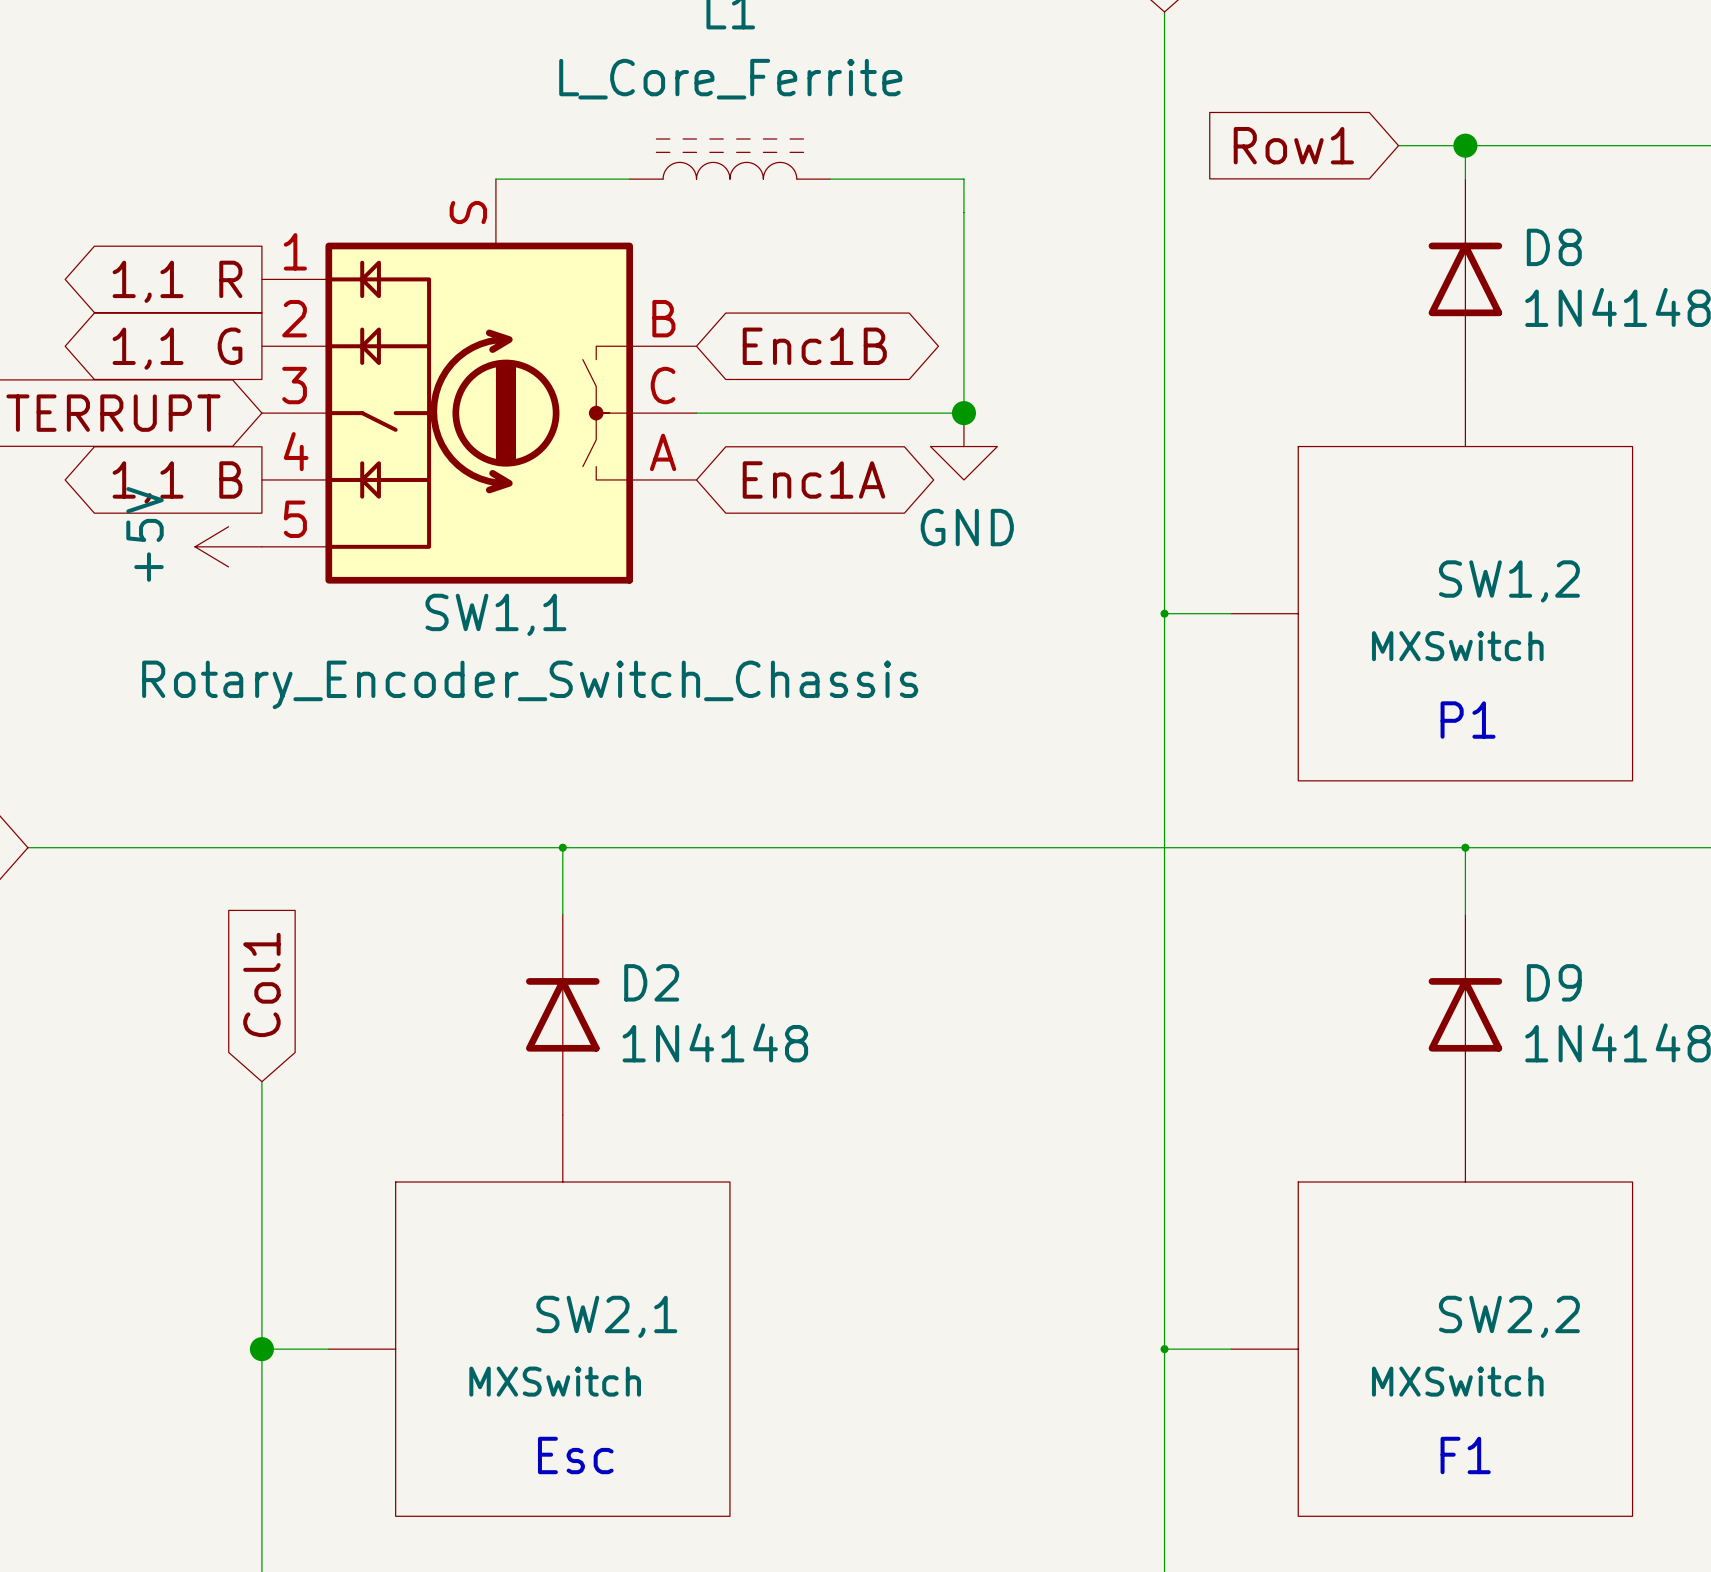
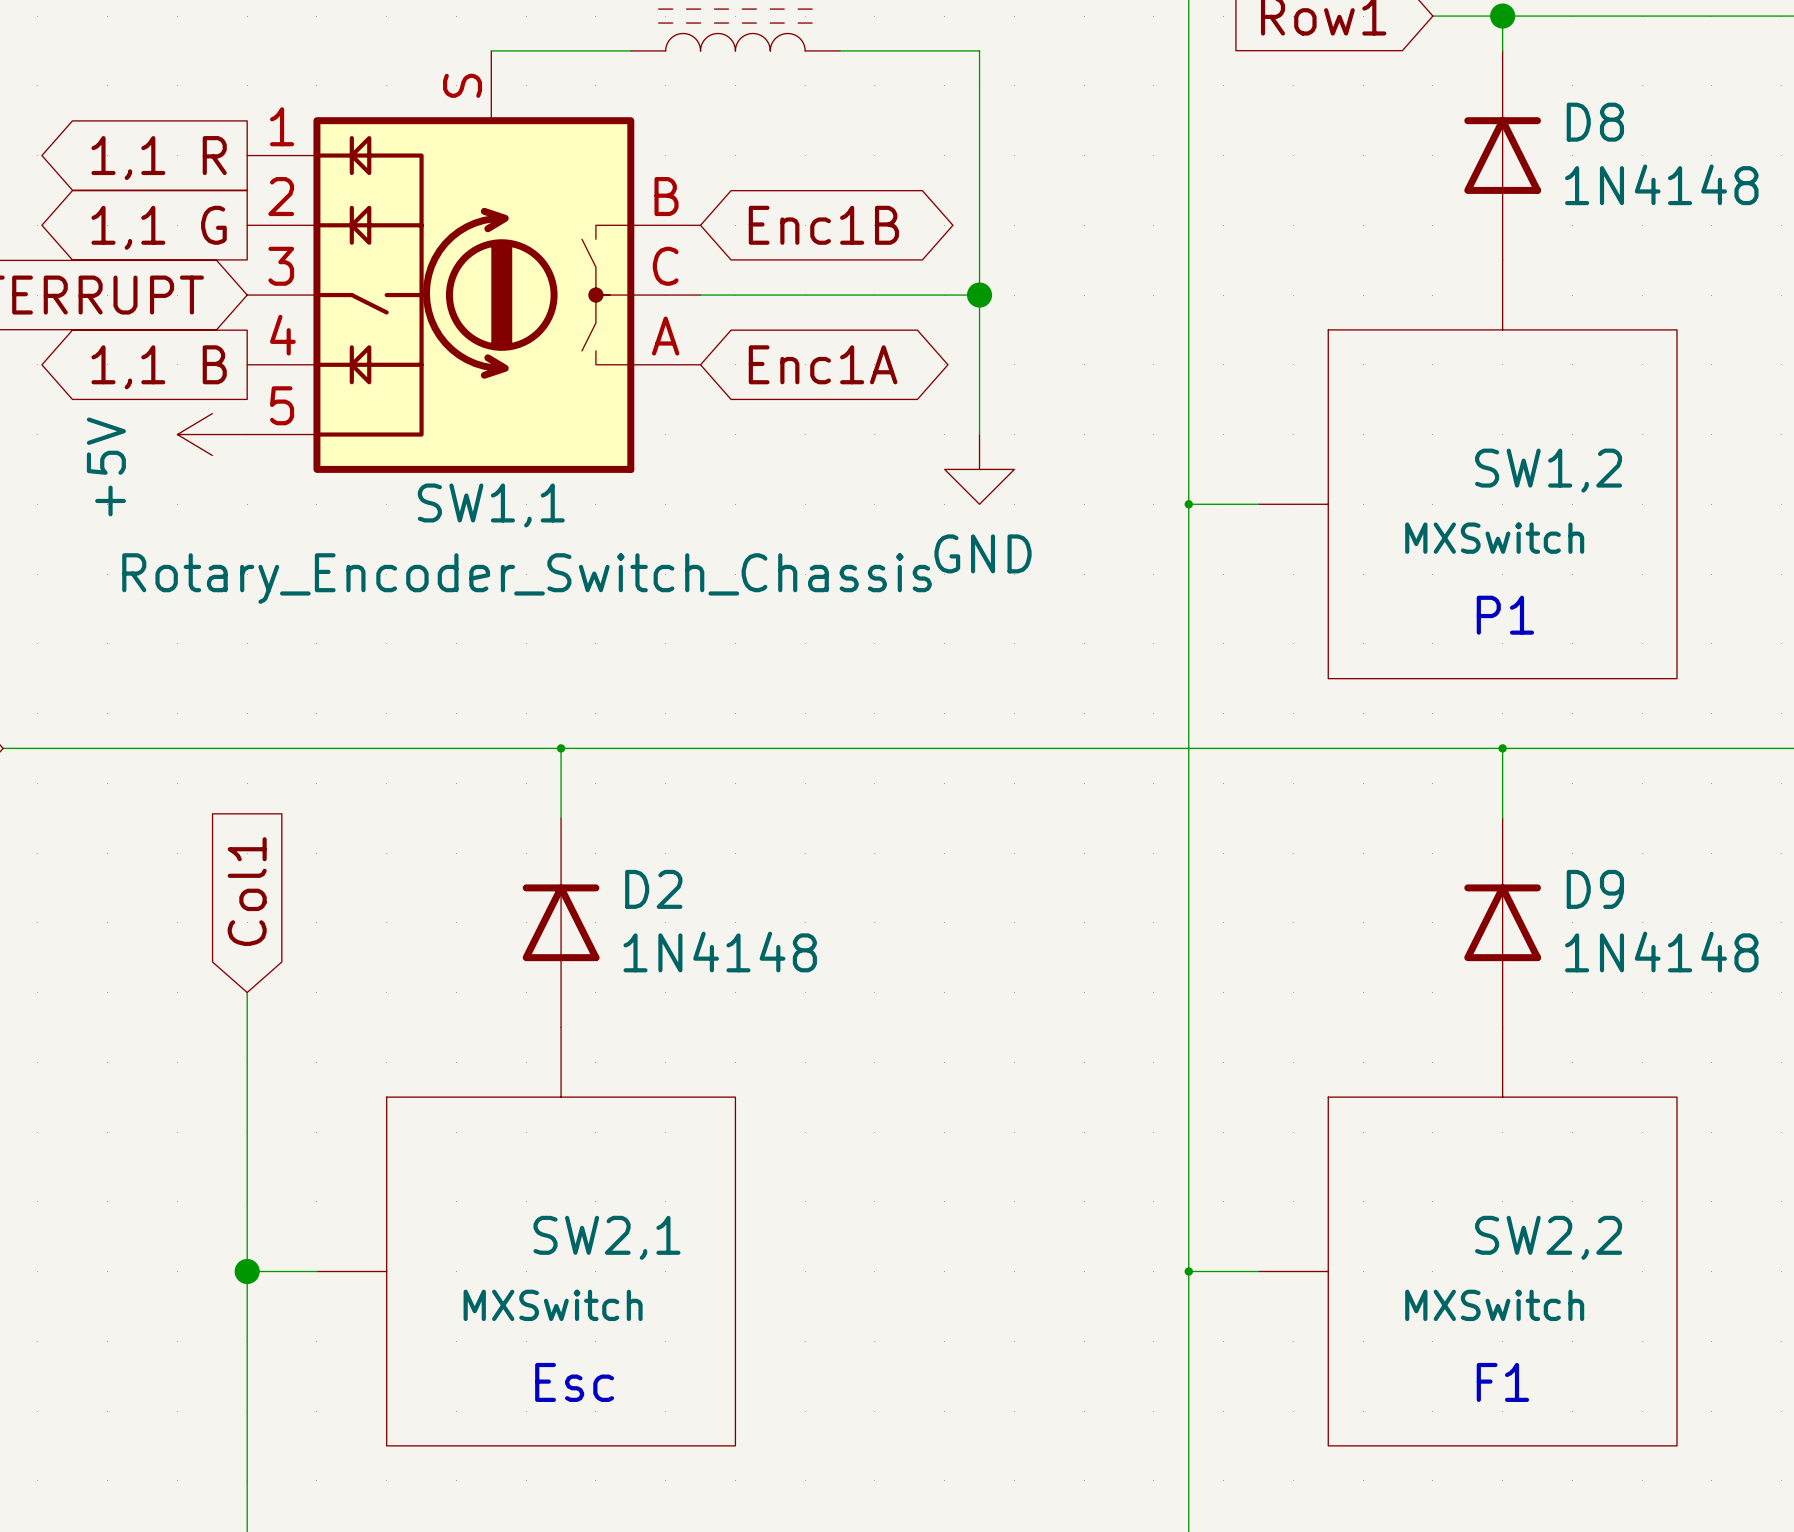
wire: none -> (979, 295) (979, 434)
power symbol position: GND (963, 446) -> GND (979, 469)
power symbol text position: +5V (145, 534) -> +5V (106, 466)

